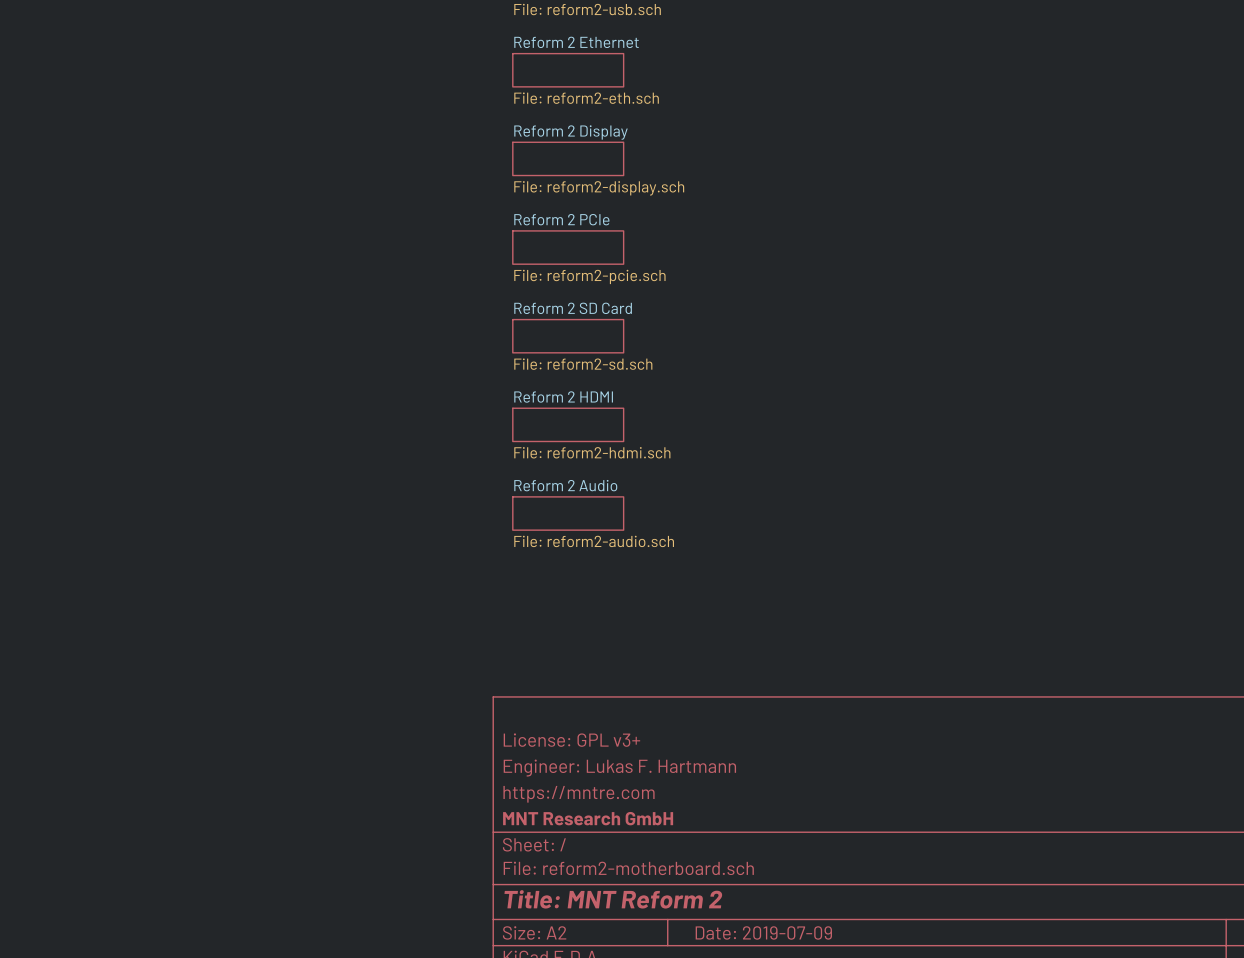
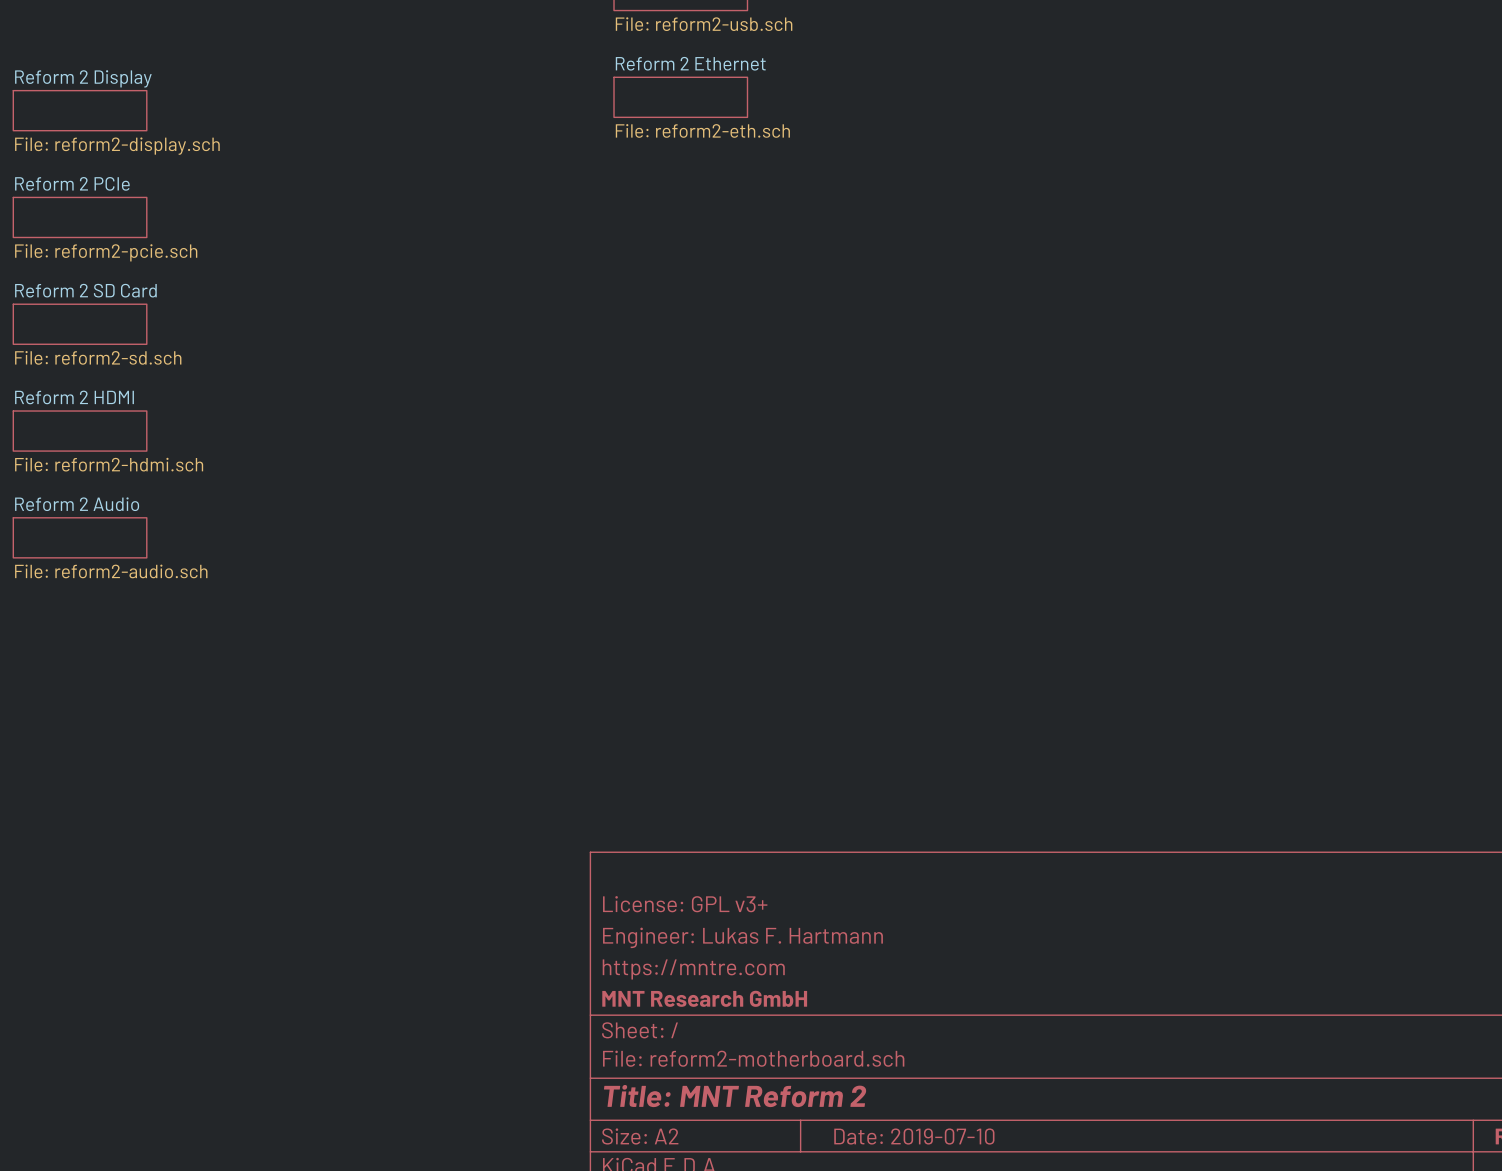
sheet Reform 2 Display position: (568, 158) -> (80, 110)
sheet Reform 2 PCIe position: (568, 247) -> (80, 217)
sheet Reform 2 SD Card position: (568, 336) -> (80, 324)
sheet Reform 2 HDMI position: (568, 424) -> (80, 431)
sheet Reform 2 Audio position: (568, 513) -> (80, 537)
title block: Date: 2019-07-09 (763, 932) -> Date: 2019-07-10 (914, 1136)

